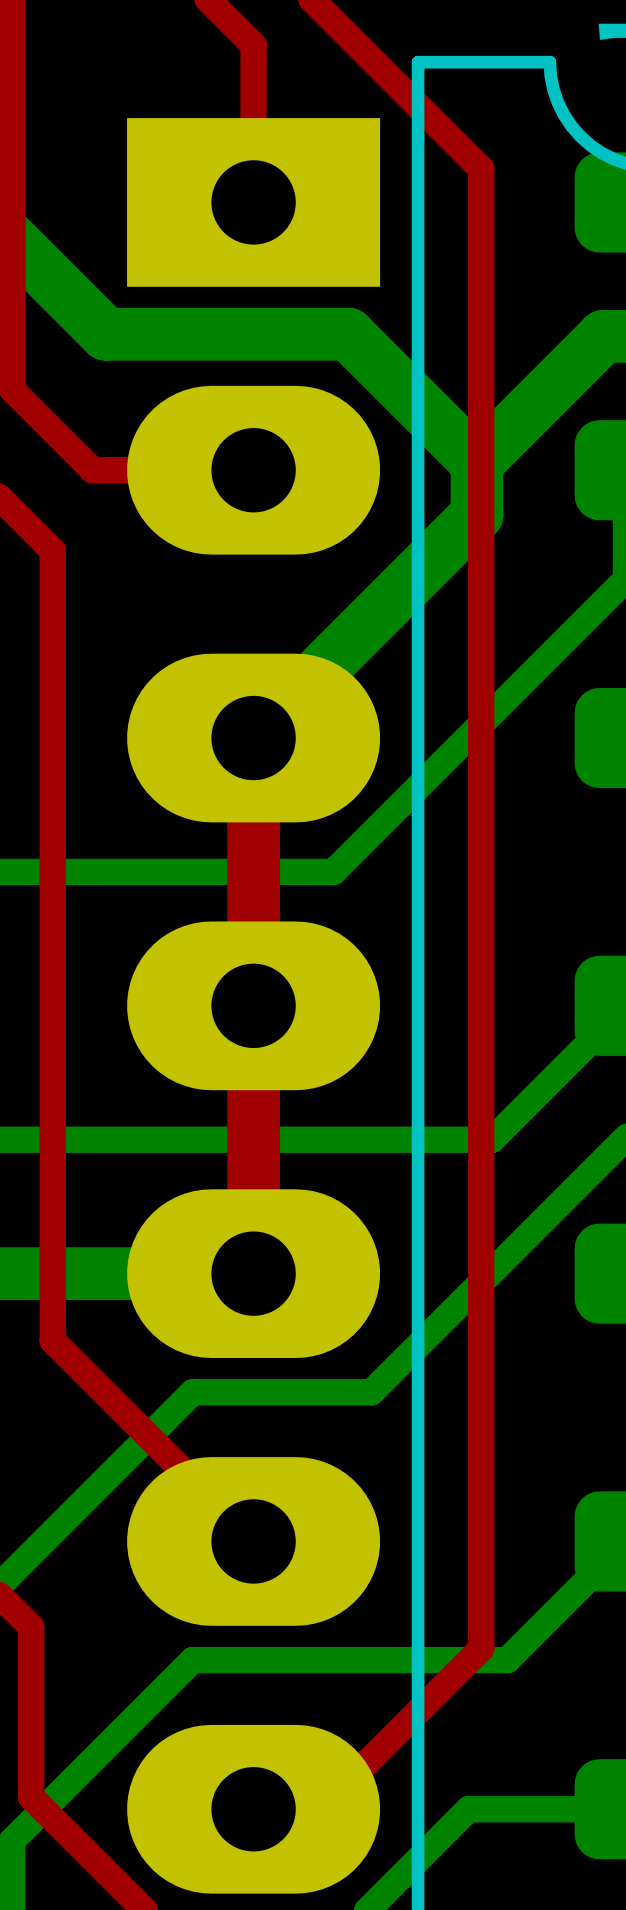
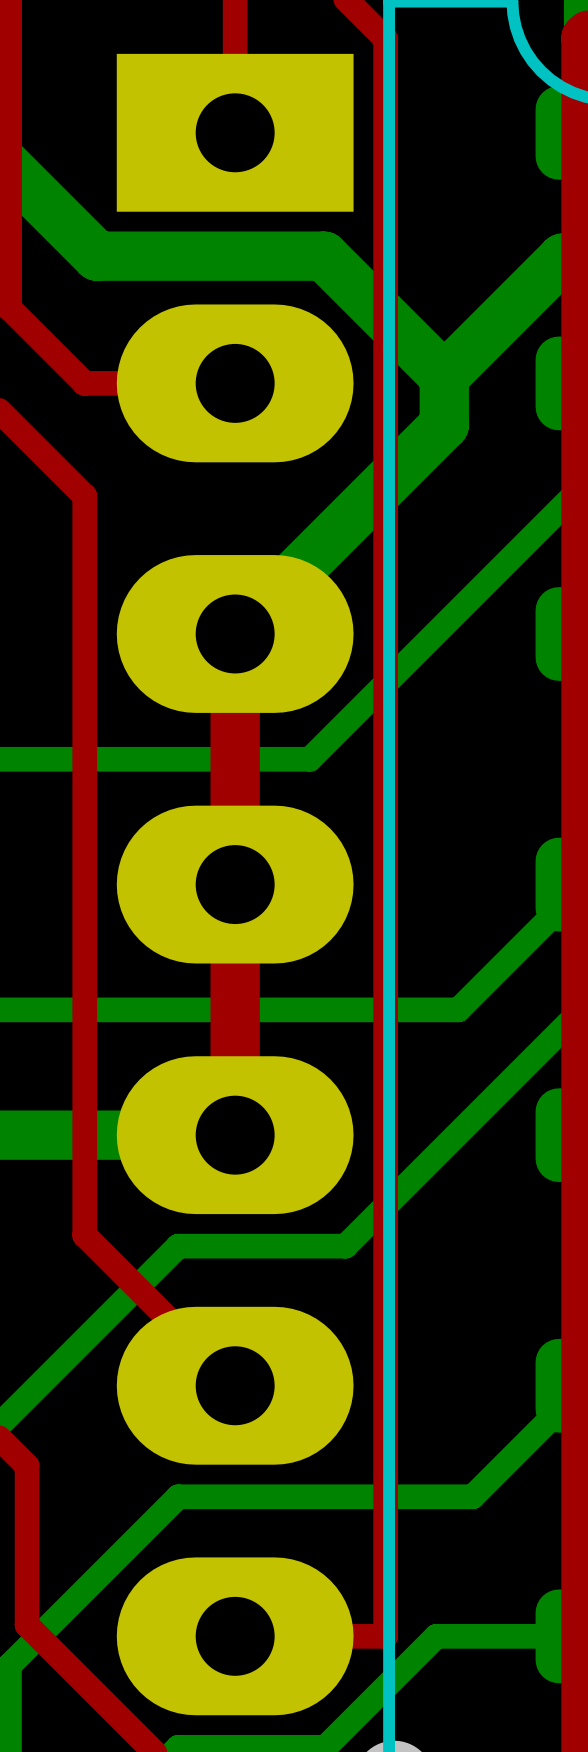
top track: (414, 102) (481, 168) (481, 1648) (320, 1809) -> (385, 38) (385, 1636) (297, 1636)
top track: (52, 550) (52, 1340) (92, 1380) -> (47, 458) (84, 496) (84, 1235)

